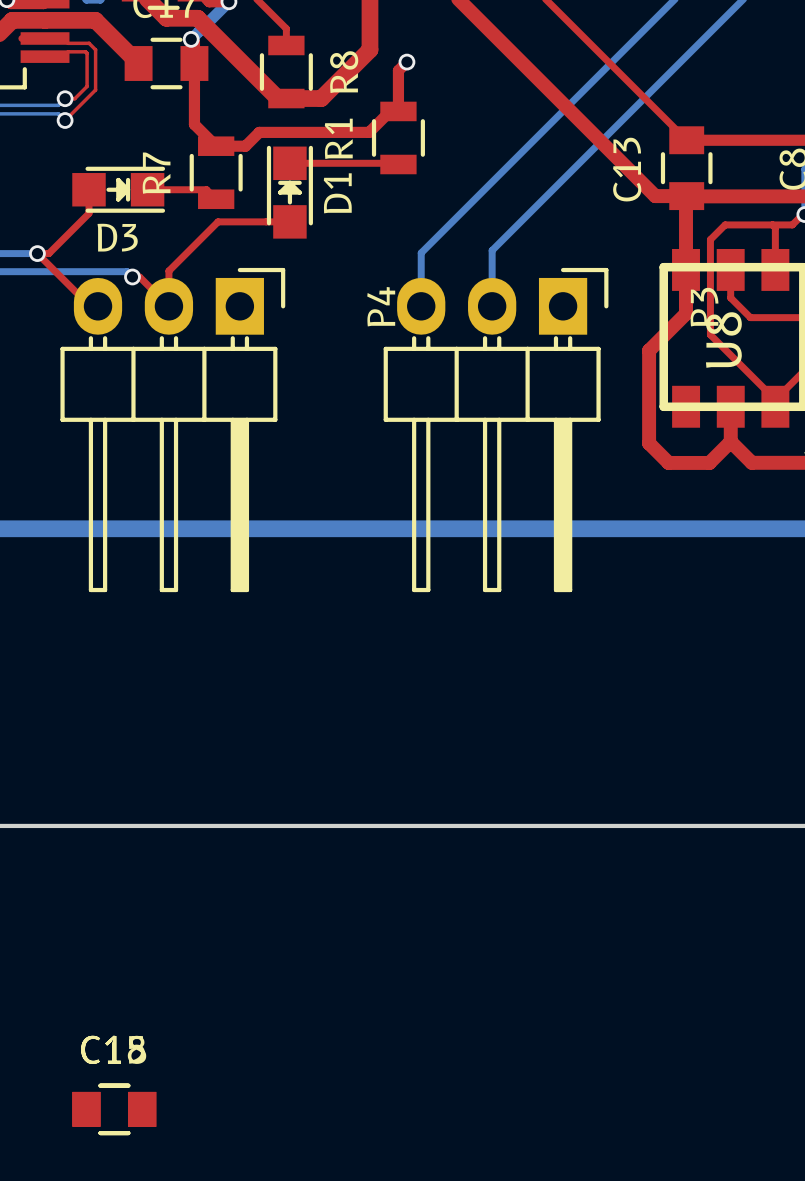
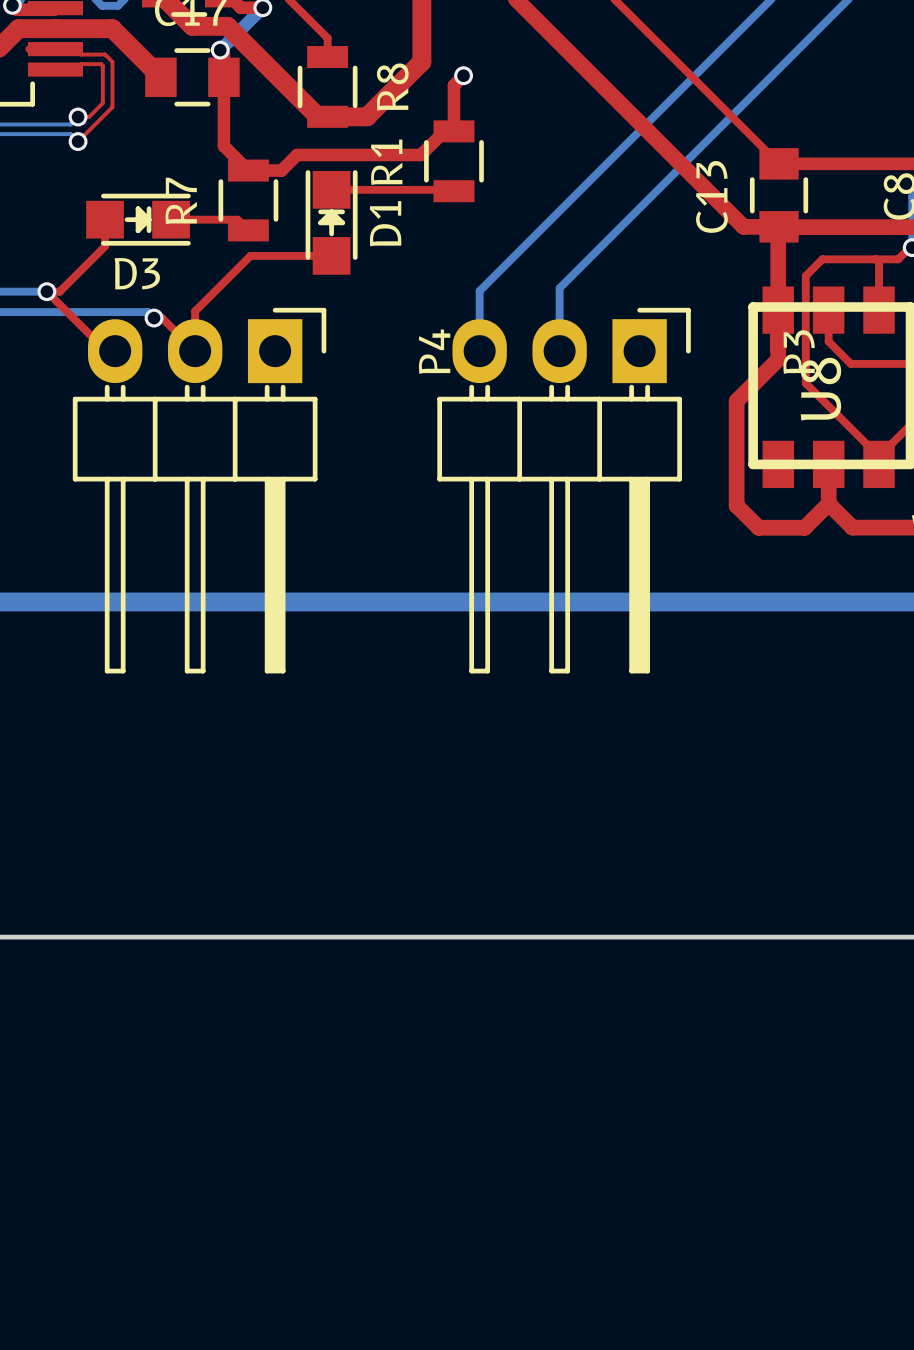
part: (114, 1109) -> none
part: (114, 1109) -> none

